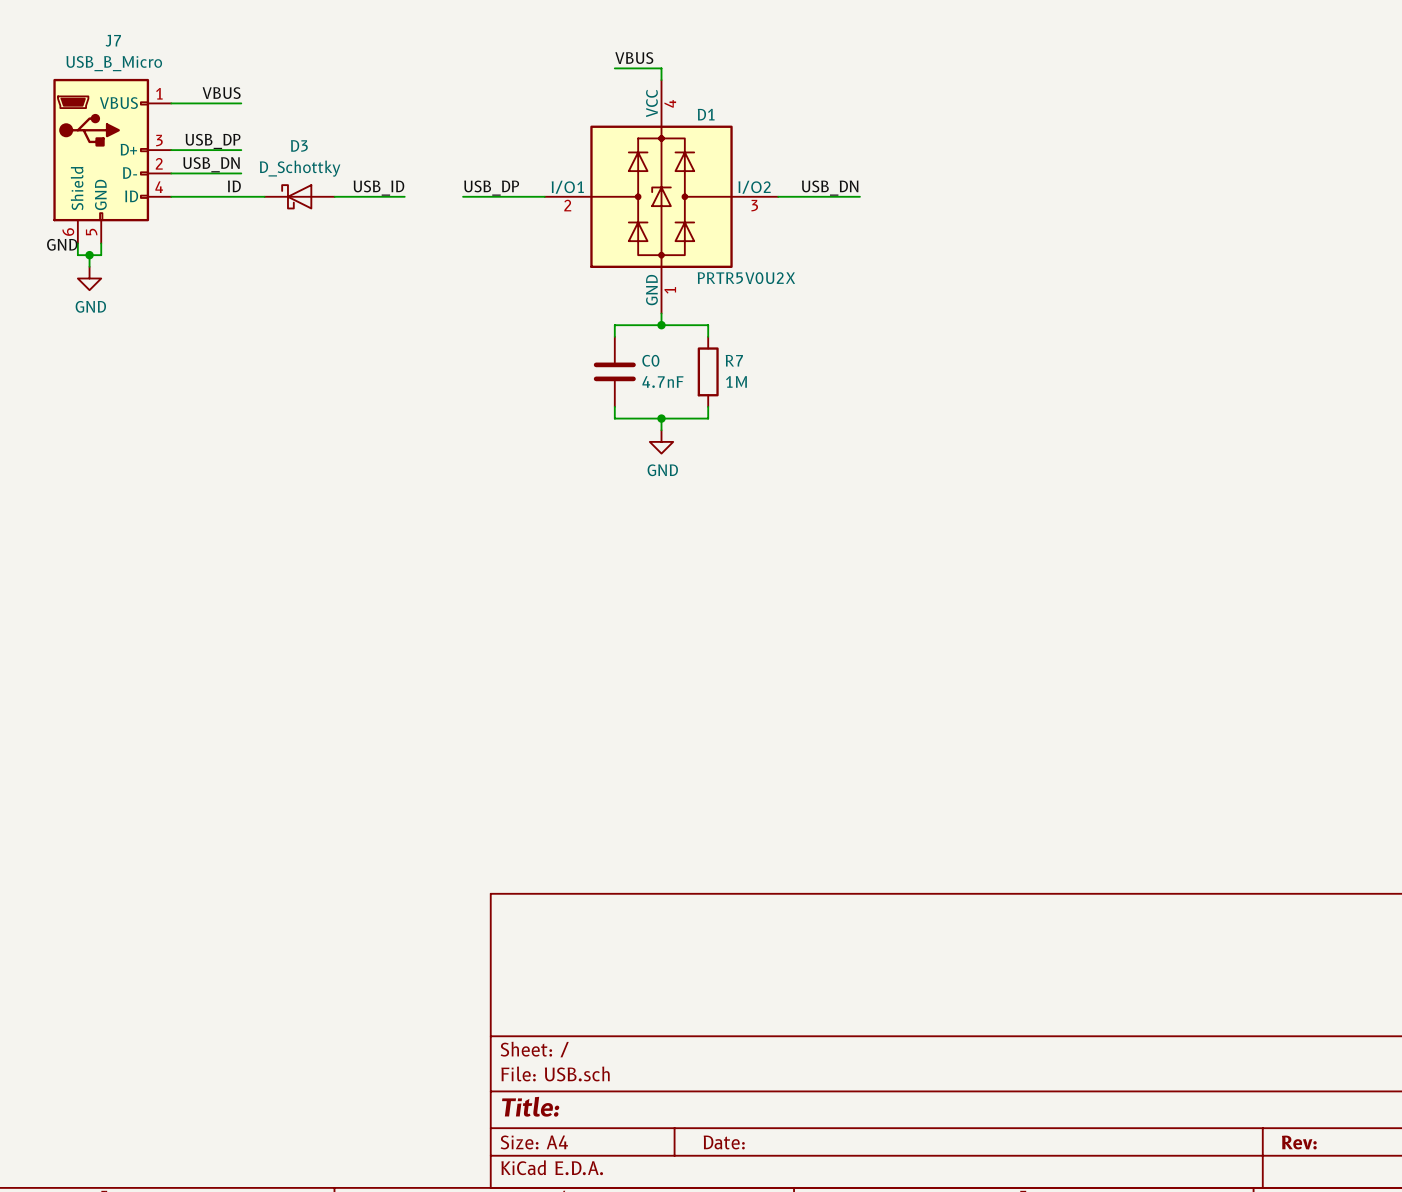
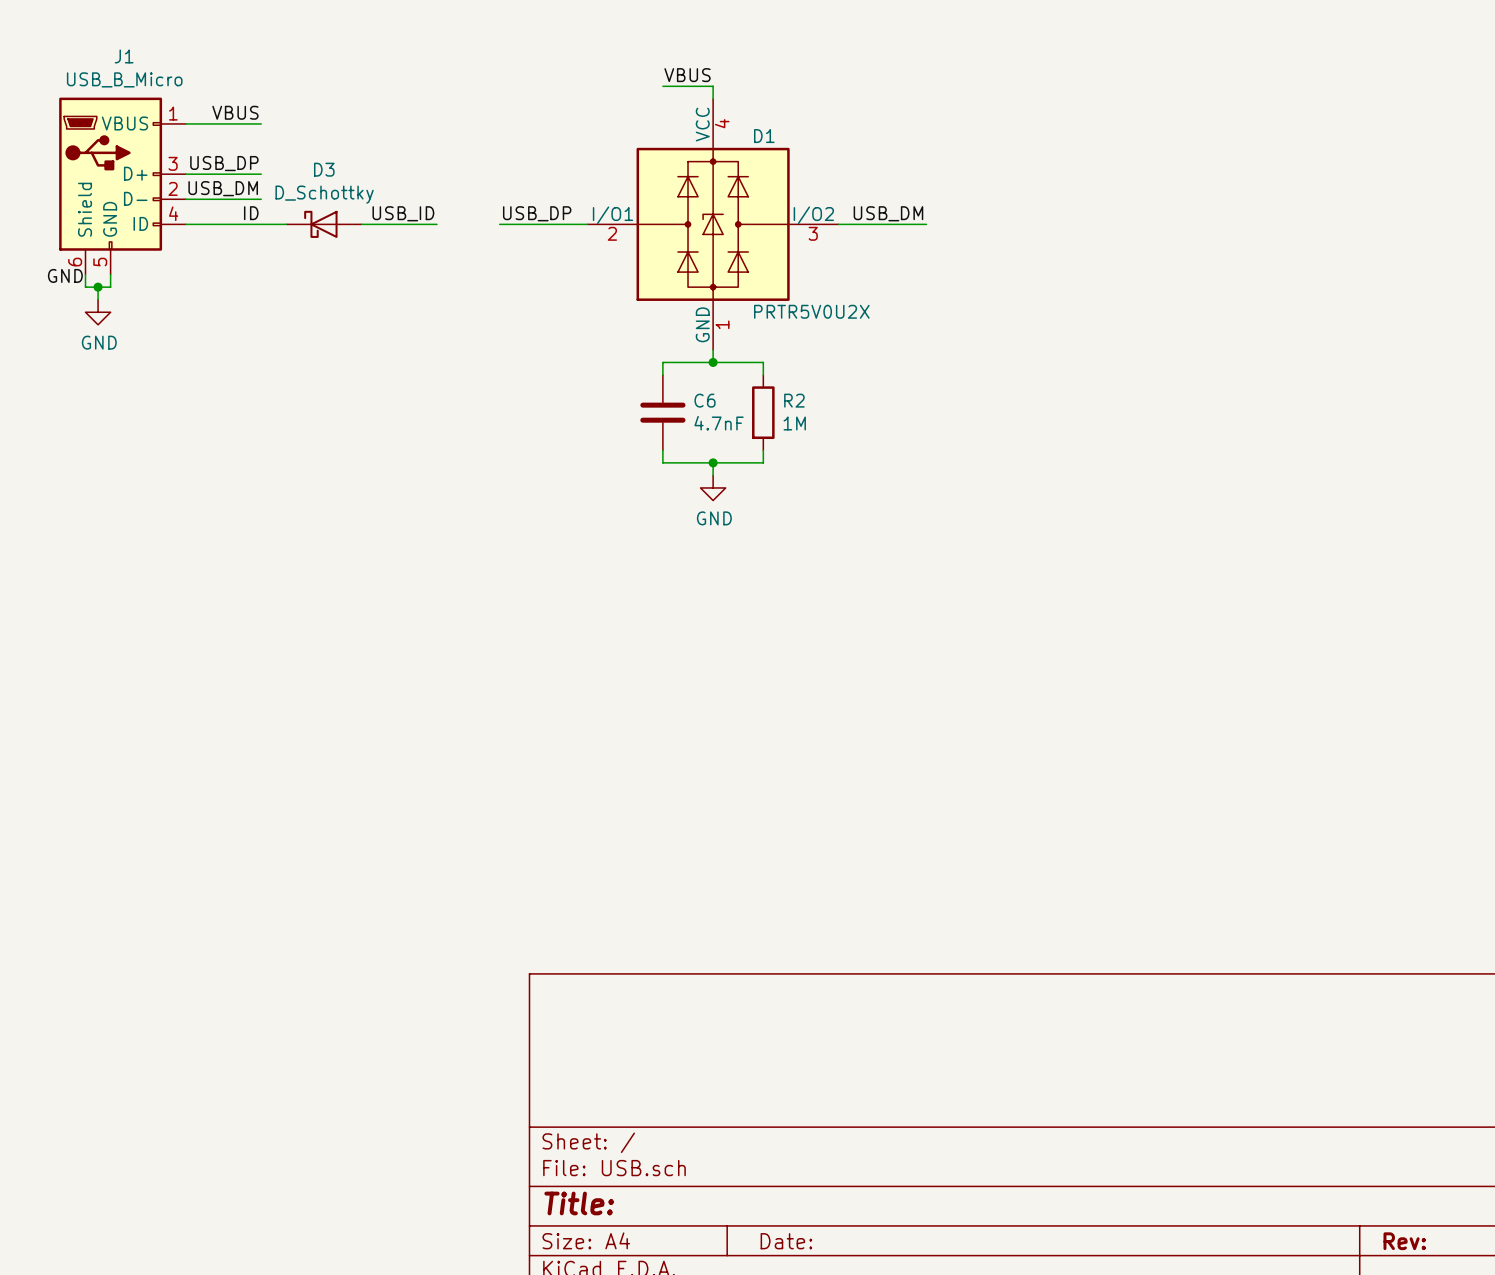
J7 name: J7 (113, 40) -> J1 (124, 56)
label: USB_DN (211, 164) -> USB_DM (223, 188)
label: USB_DN (830, 188) -> USB_DM (888, 213)
C0 name: C0 (650, 360) -> C6 (705, 400)
R7 name: R7 (734, 360) -> R2 (794, 400)

